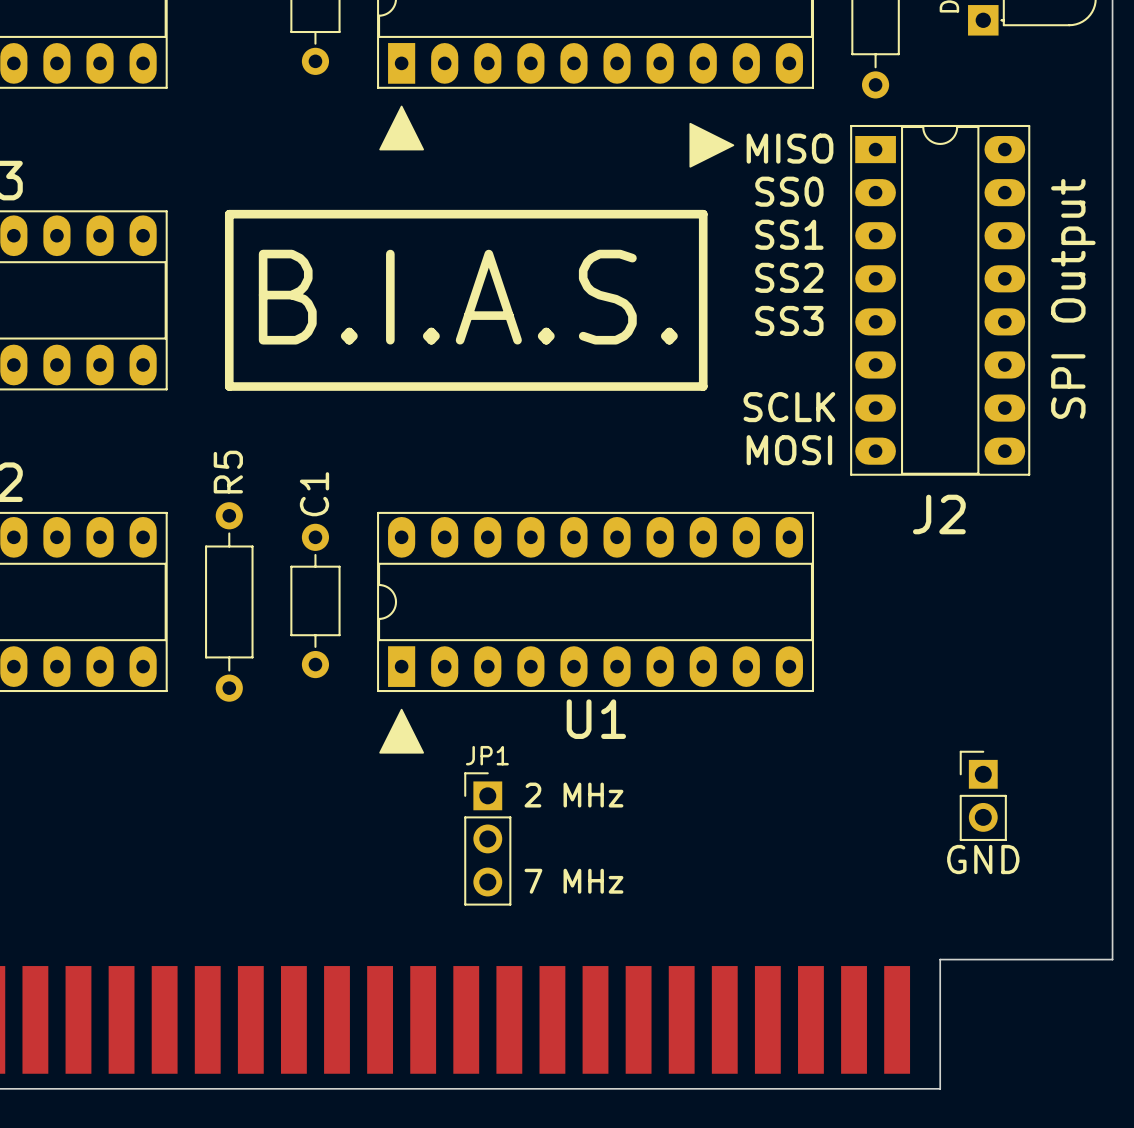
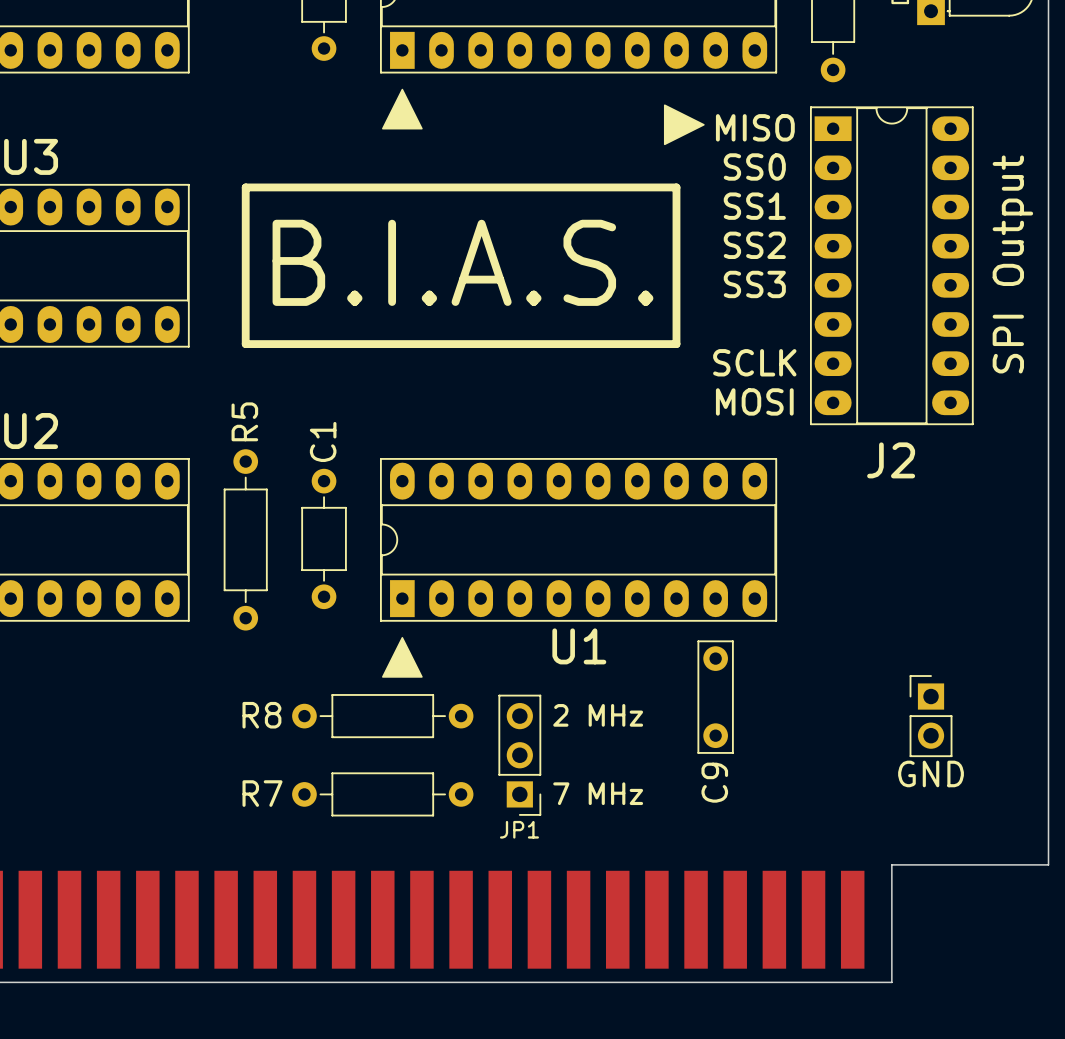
C9: none -> (715, 697)
R8: none -> (382, 716)
text position: 2 MHz (573, 795) -> 2 MHz (598, 715)
JP1 rotation: 0° (487, 838) -> 180° (519, 755)
text position: 7 MHz (573, 881) -> 7 MHz (598, 793)
R7: none -> (382, 794)

